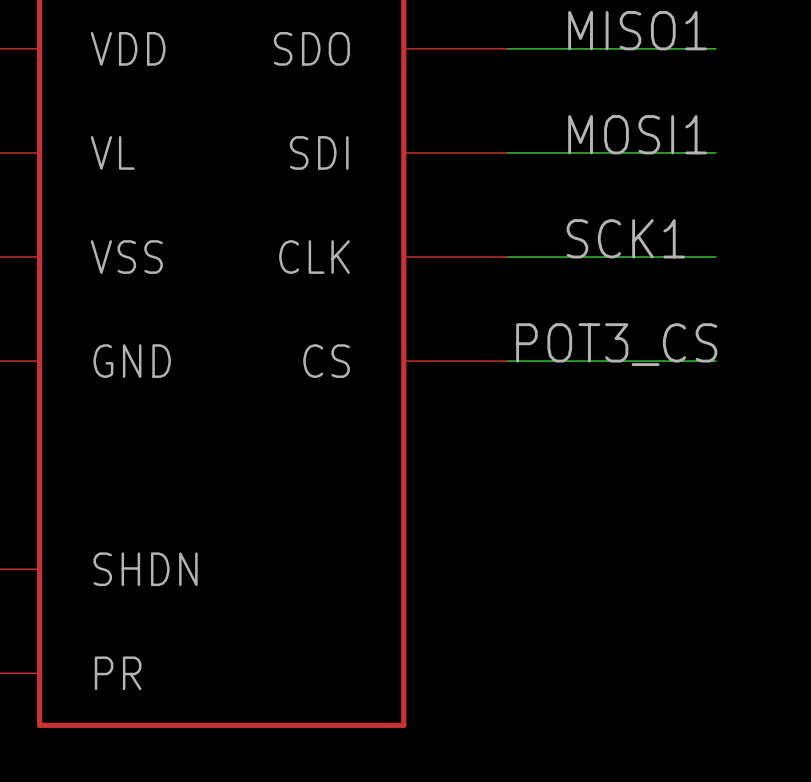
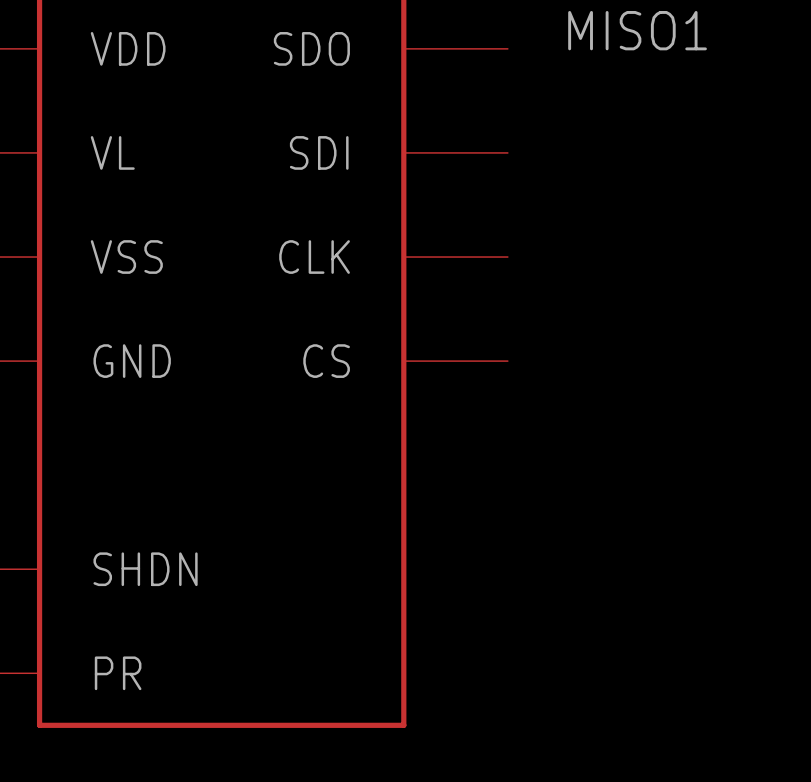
wire: (507, 48) (716, 48) -> none
label: MOSI1 (637, 134) -> none
wire: (507, 152) (716, 152) -> none
label: SCK1 (625, 238) -> none
wire: (507, 257) (716, 257) -> none
label: POT3_CS (616, 344) -> none
wire: (507, 361) (716, 361) -> none

